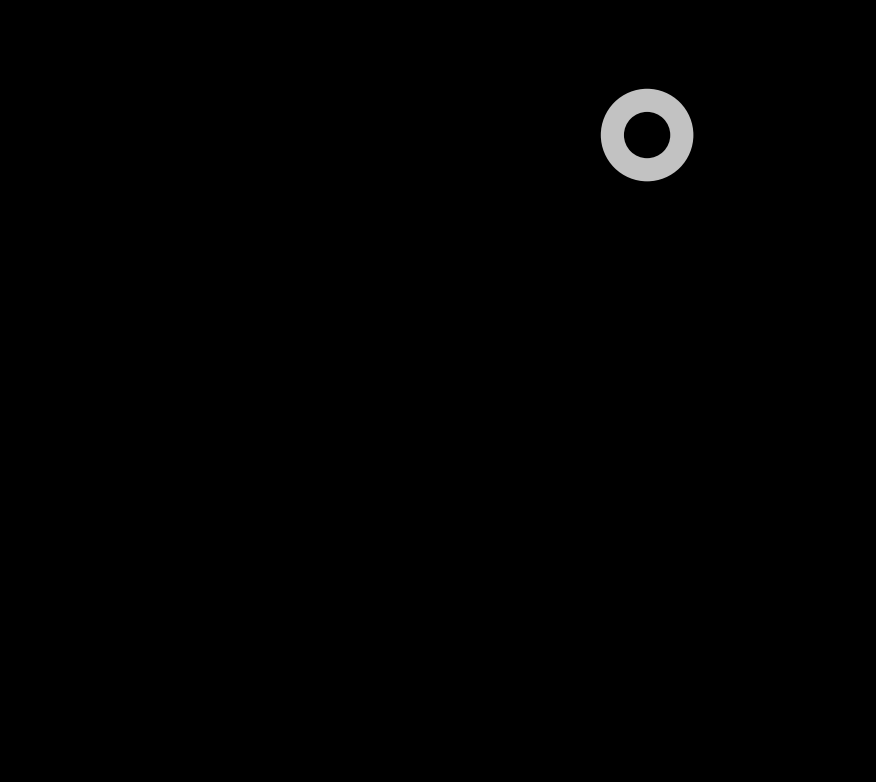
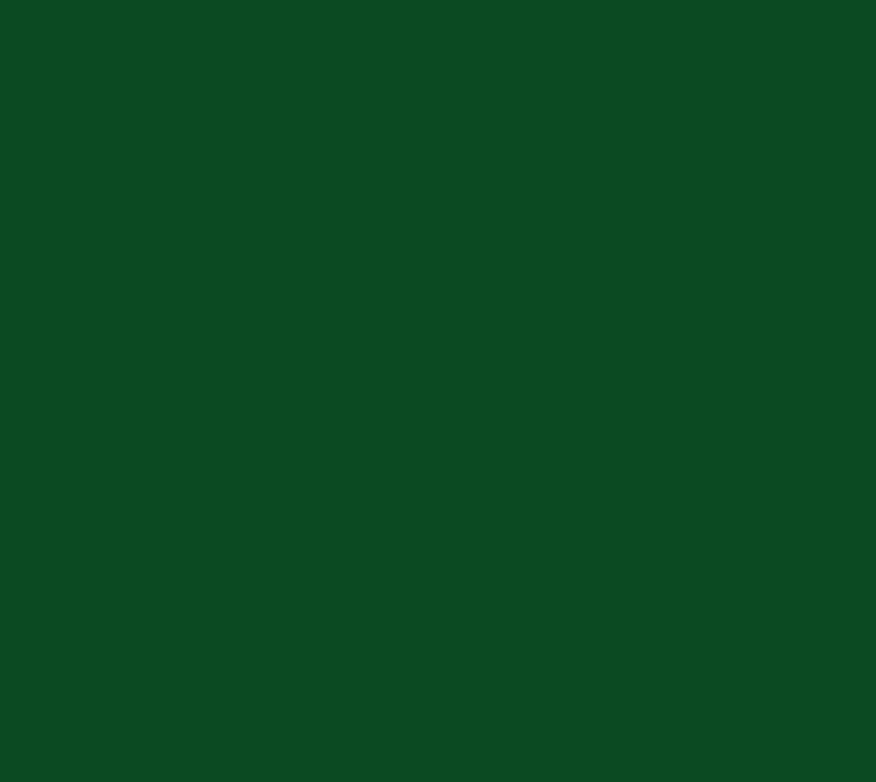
via: (647, 135) -> none

